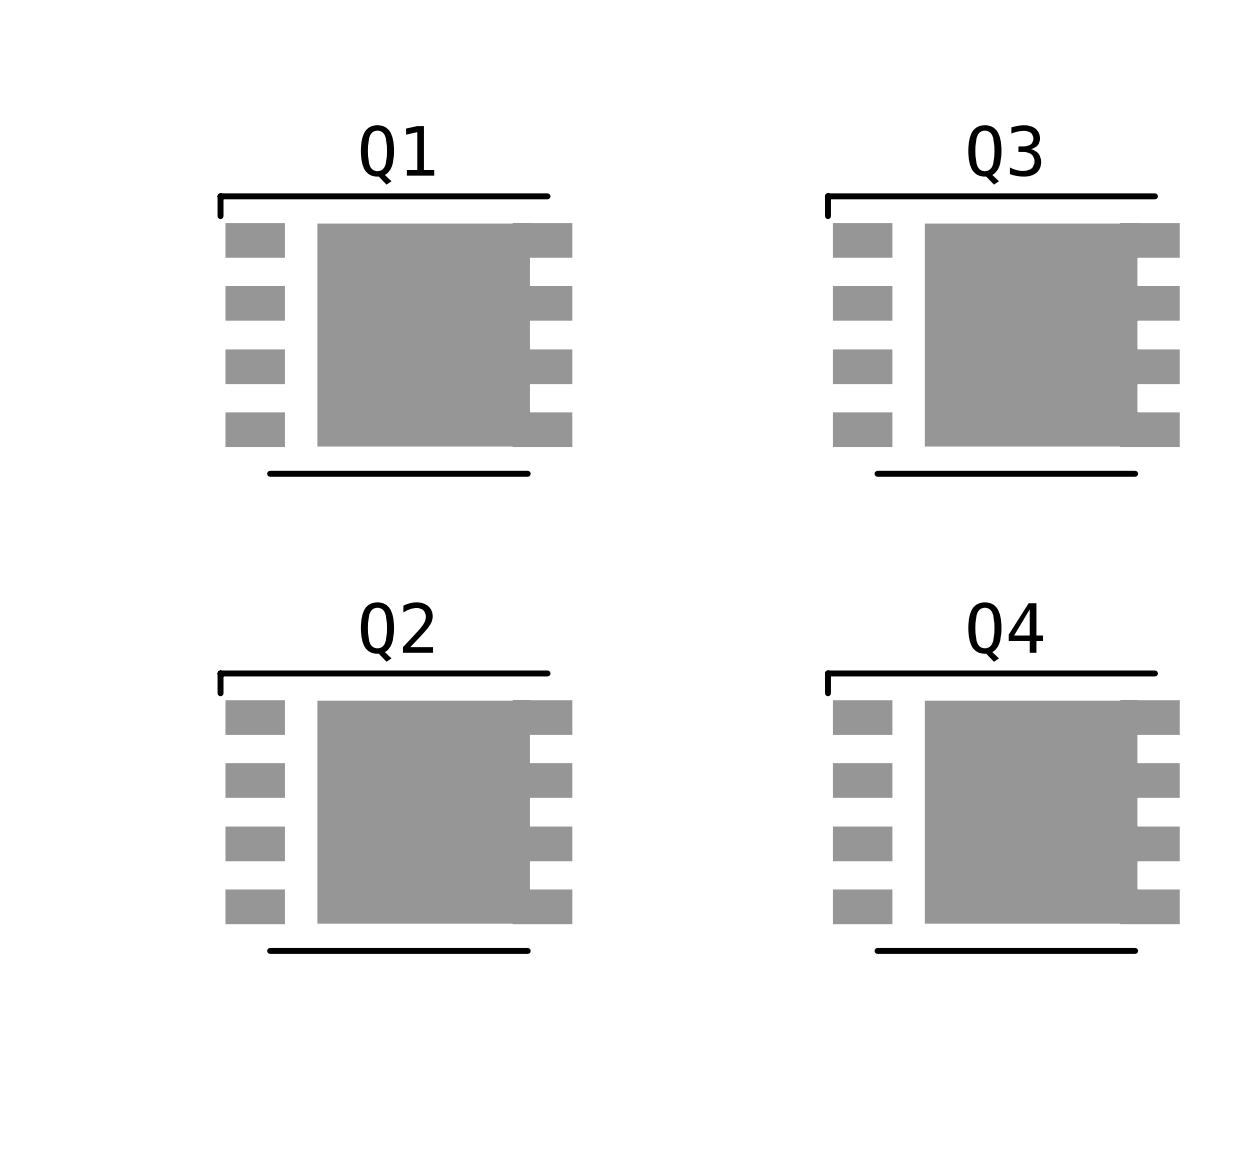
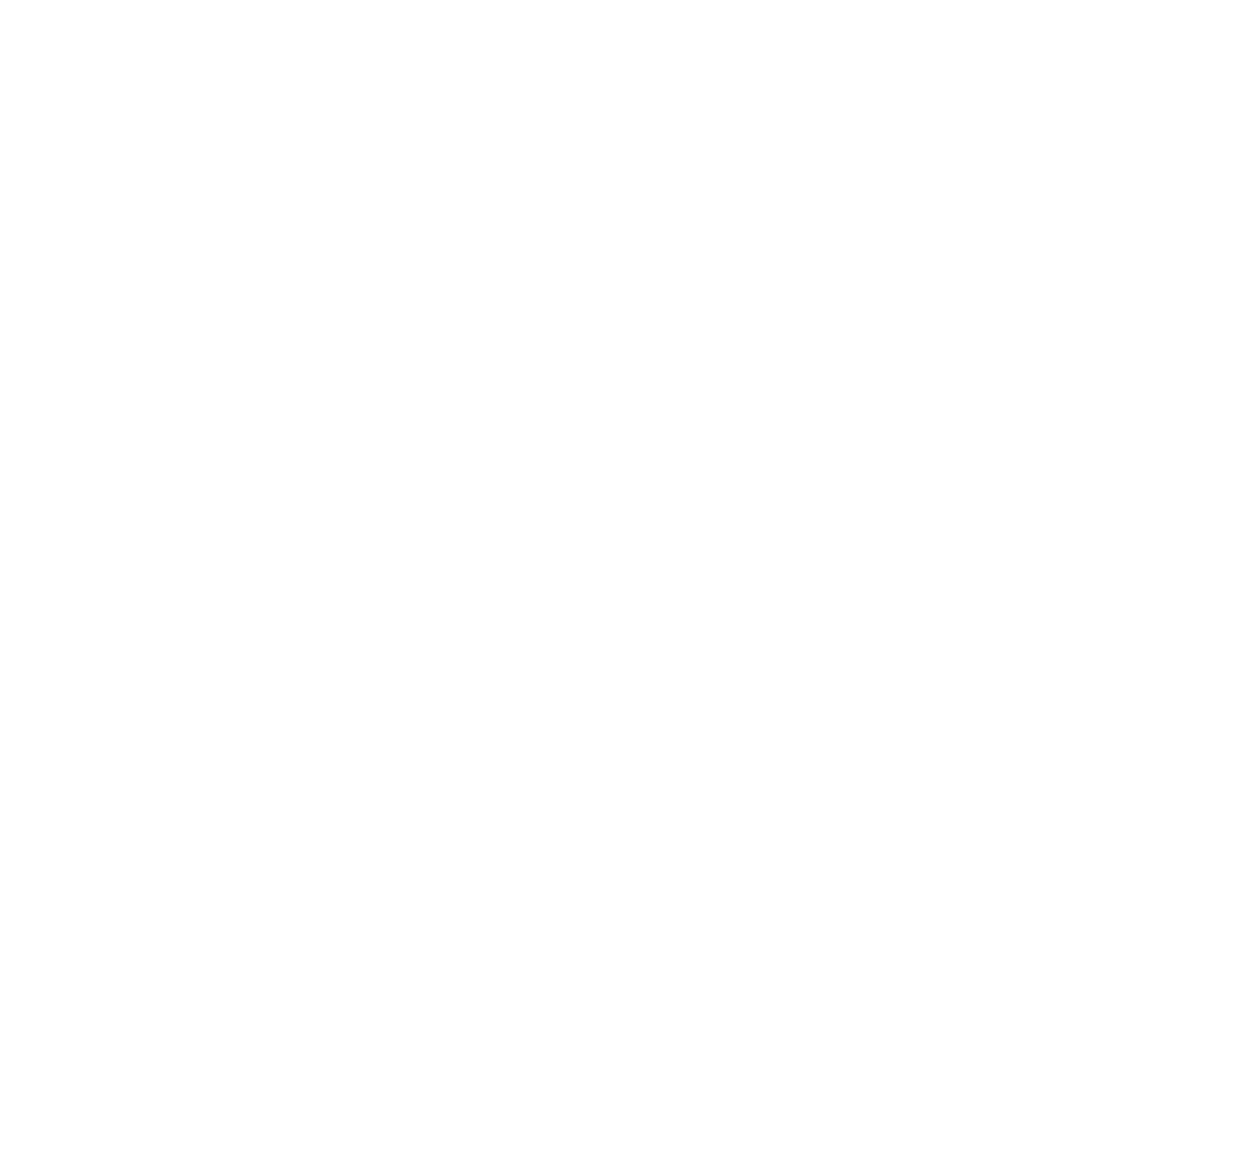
Q1: (394, 335) -> none
Q3: (1002, 335) -> none
Q2: (394, 812) -> none
Q4: (1002, 812) -> none

